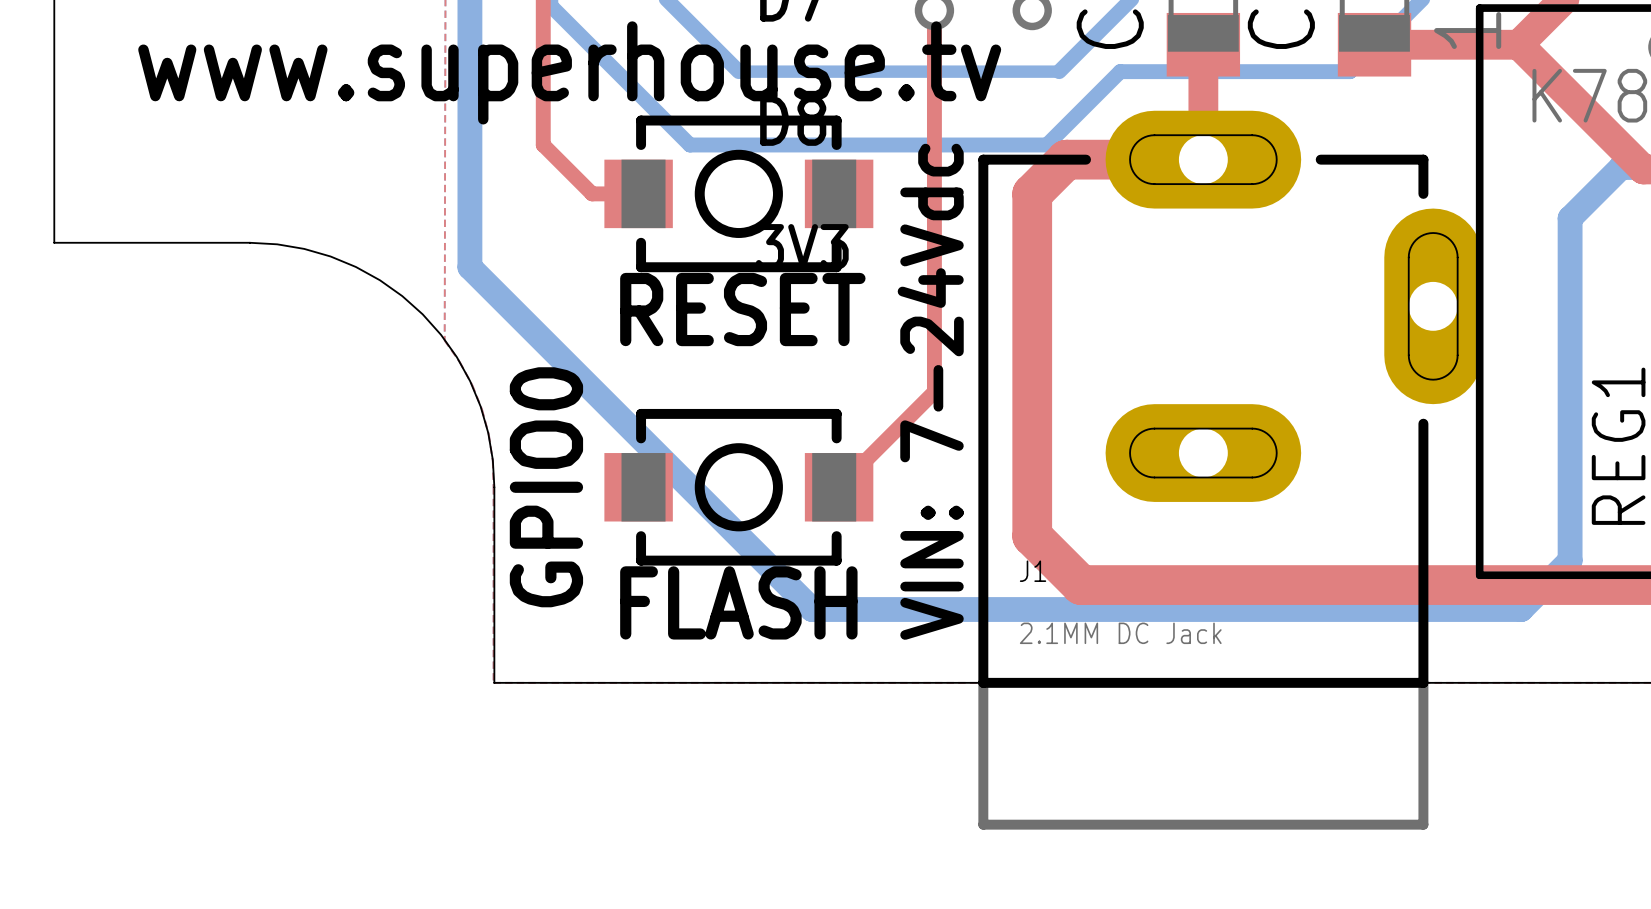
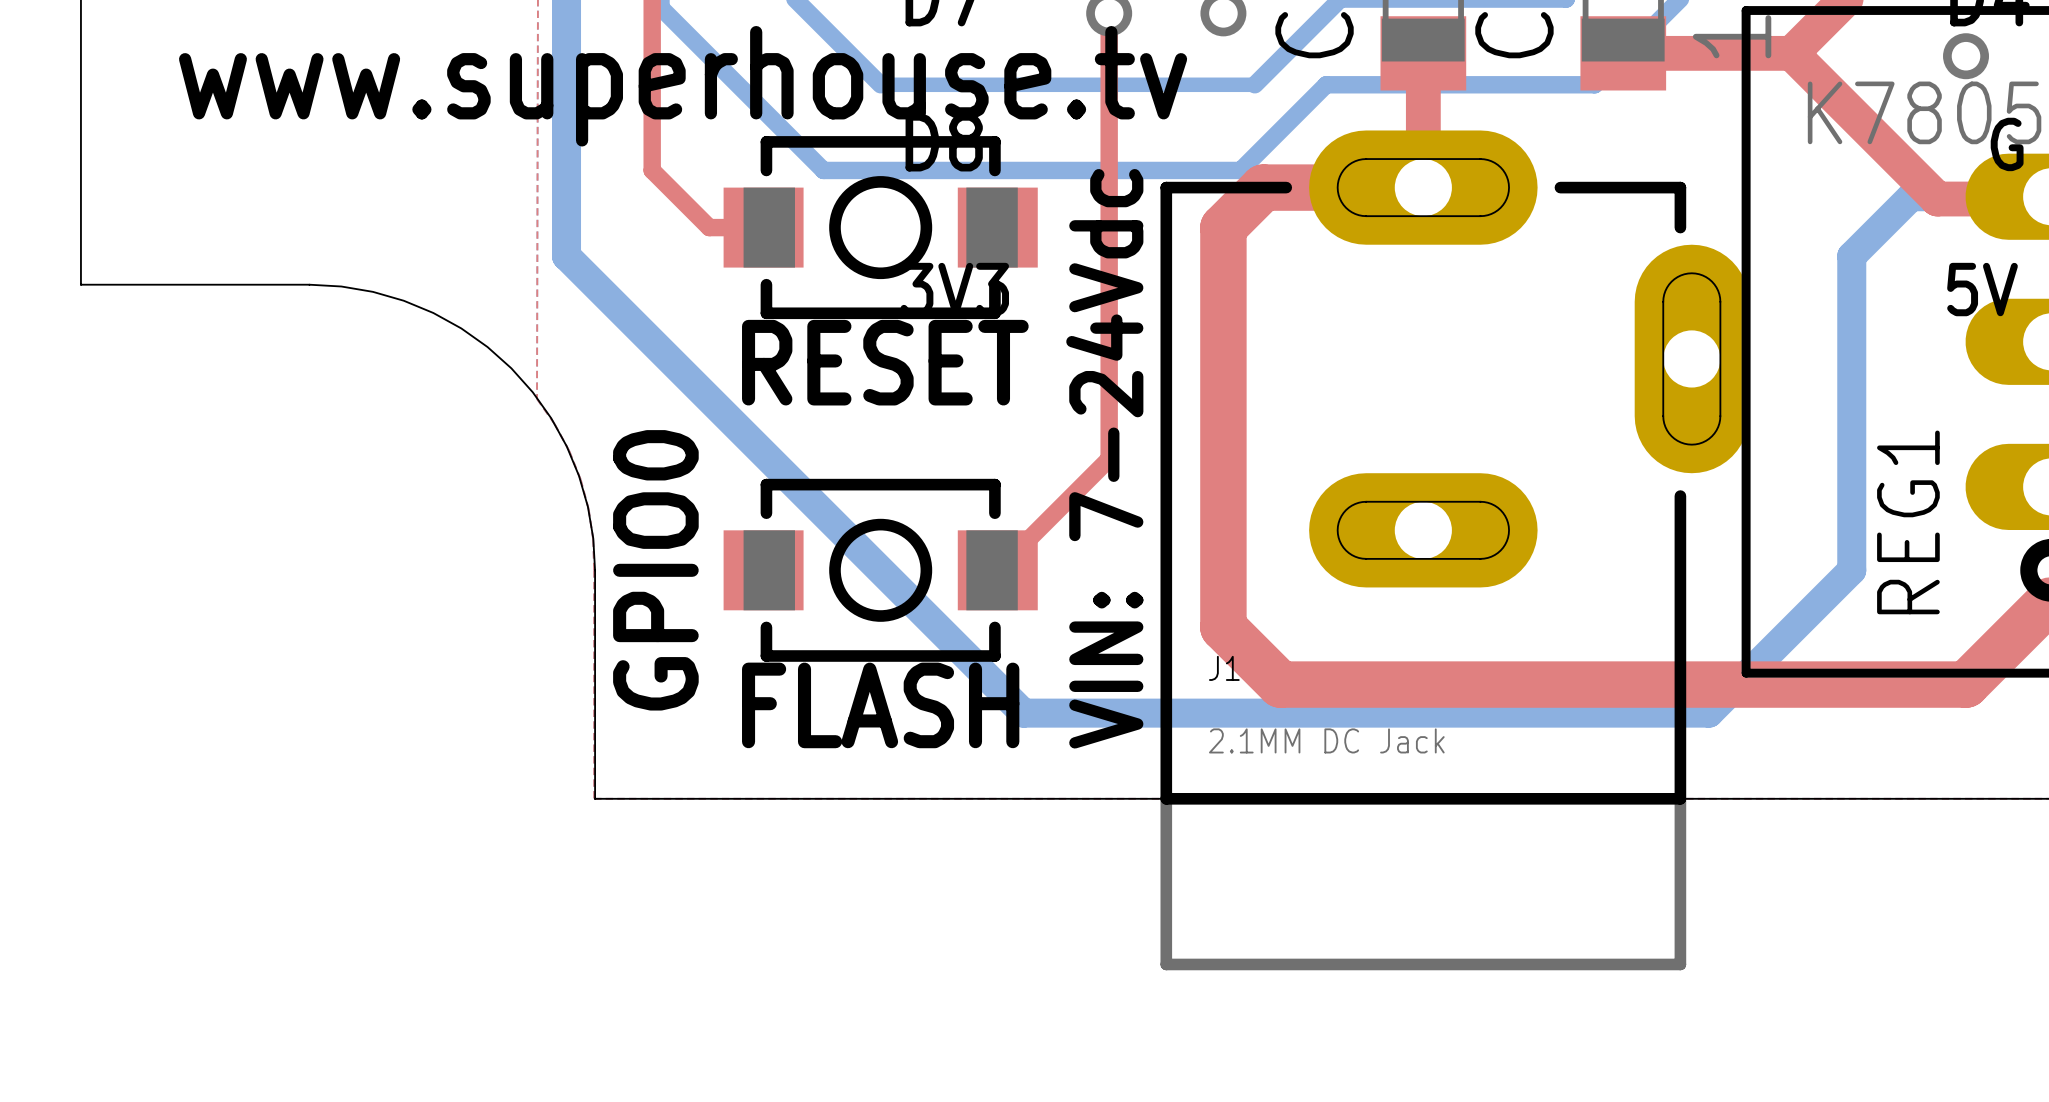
bottom track: (469, 218) (469, 267) (812, 609) (861, 609) -> (566, 256) (1023, 713)
bottom track: (1570, 487) (1570, 560) (1521, 609) (1447, 609) -> (1851, 570) (1708, 713)

